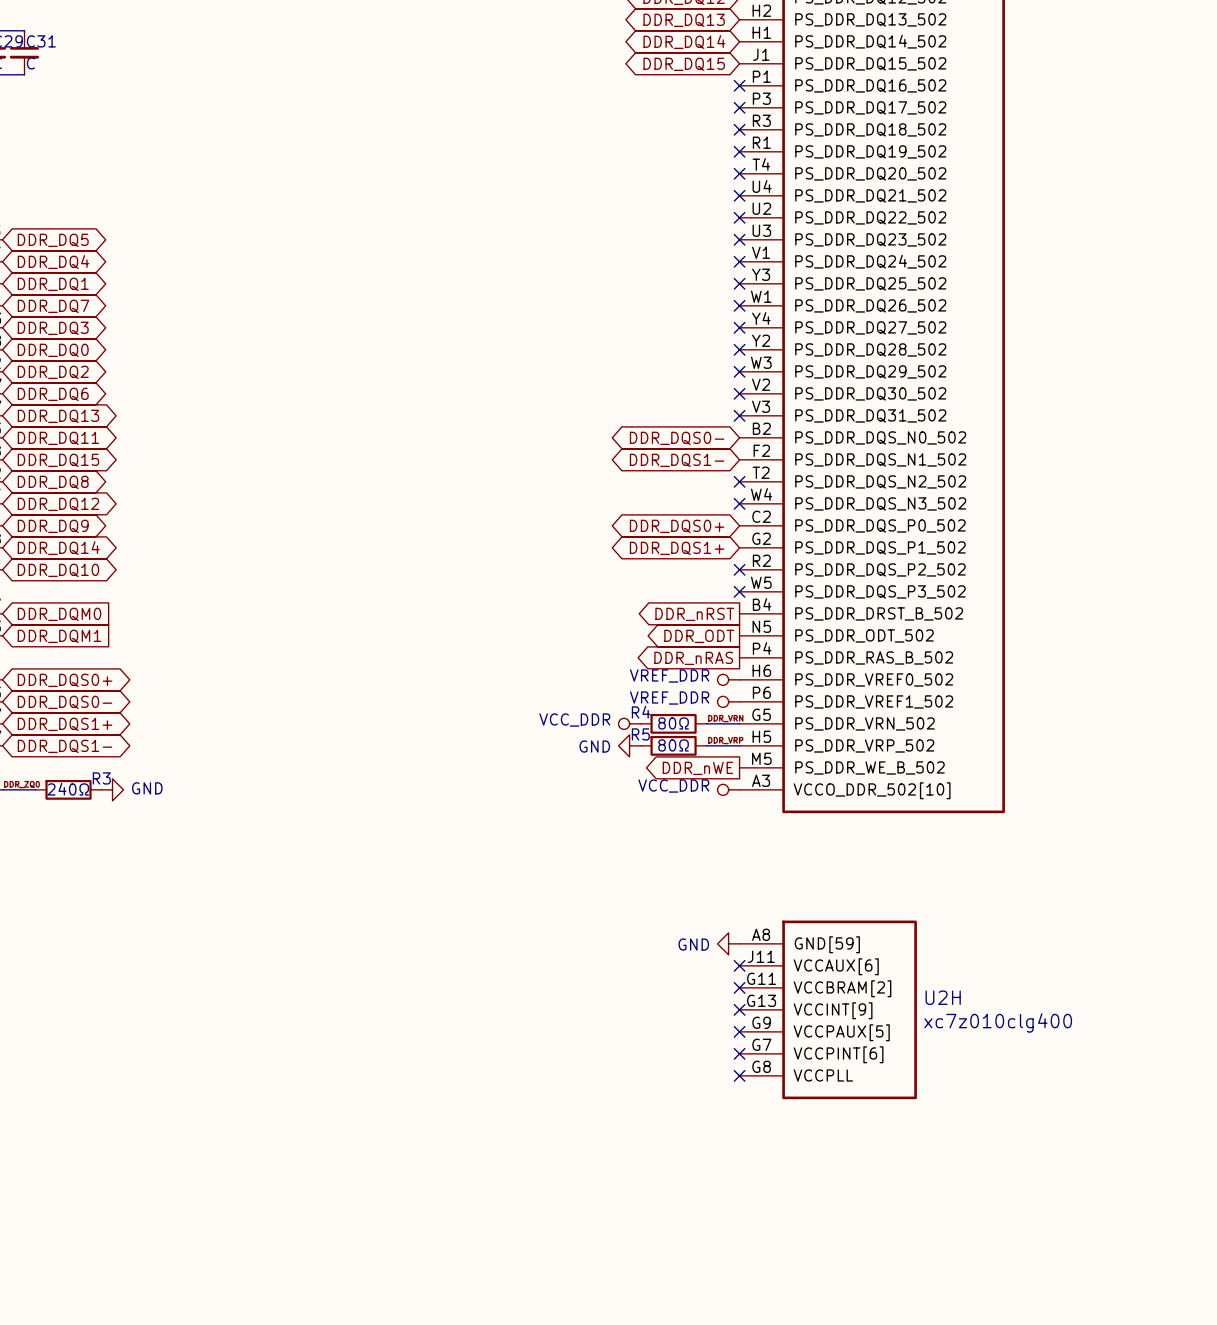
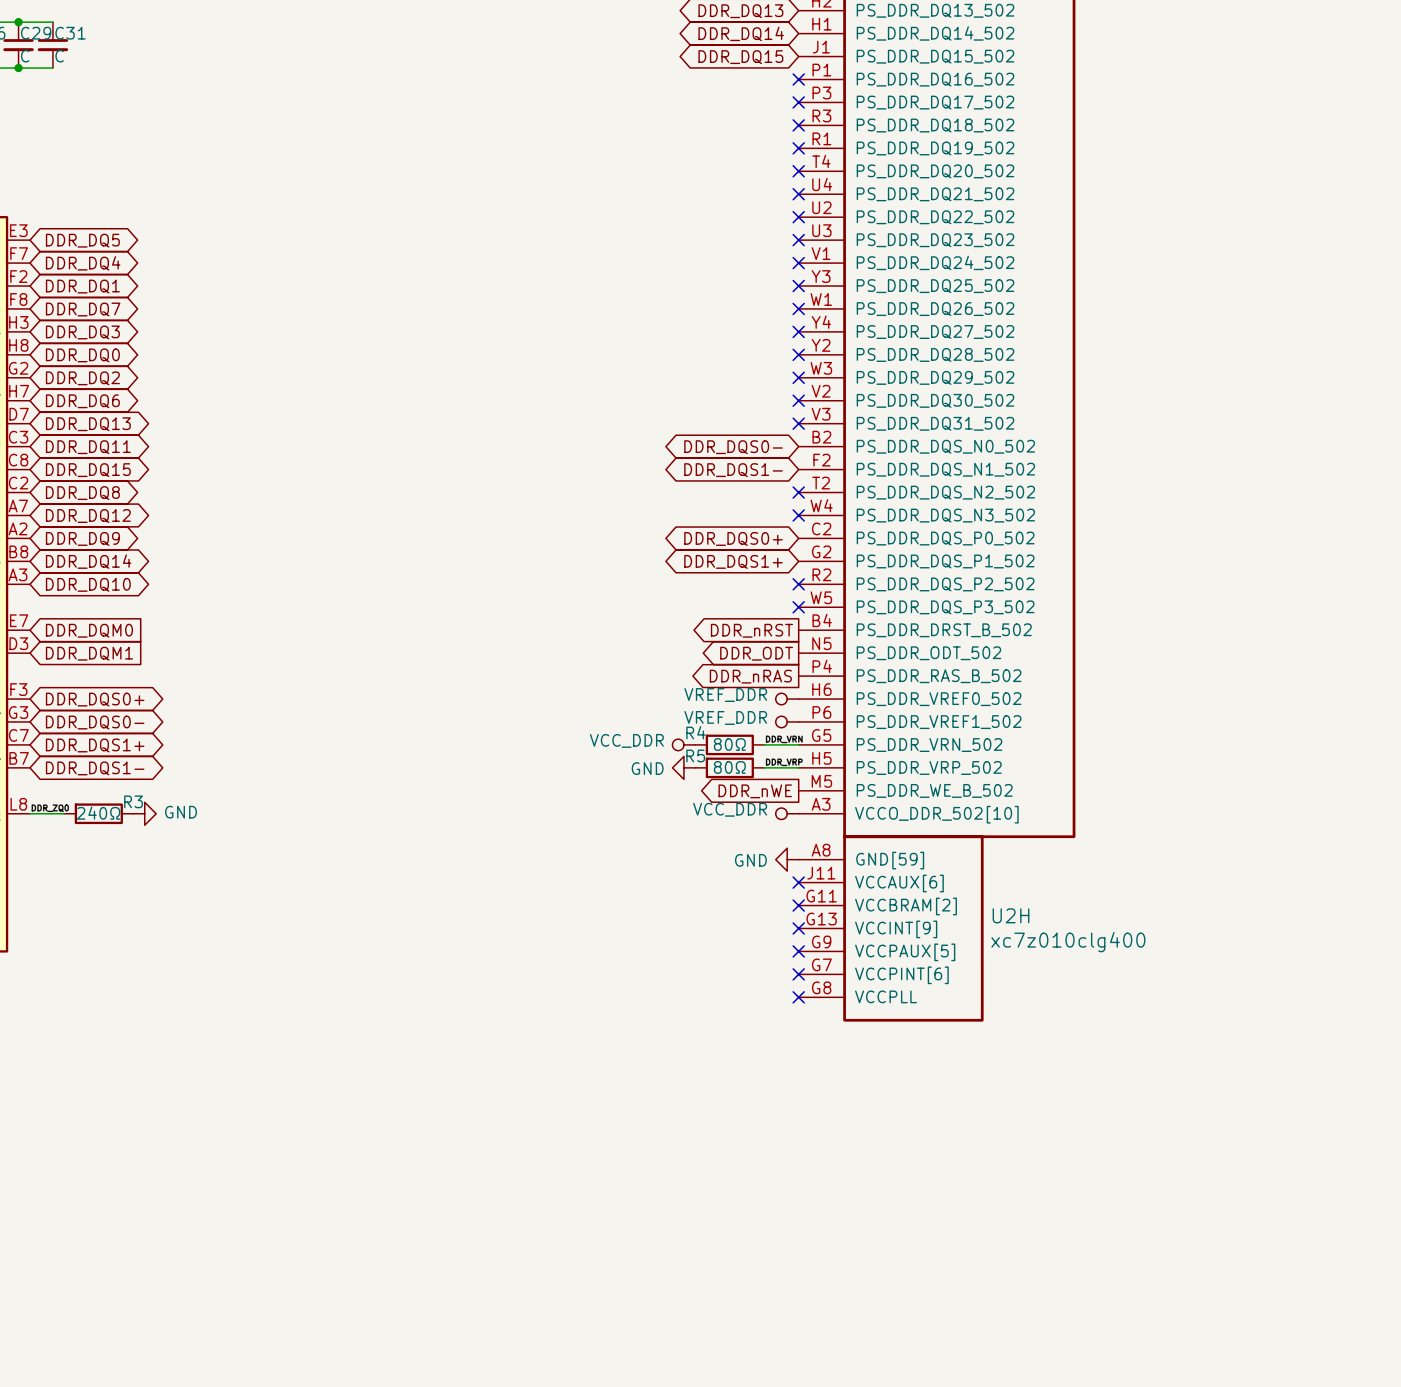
no-connect mark: none -> (798, 882)
no-connect mark: none -> (798, 905)
no-connect mark: none -> (798, 928)
no-connect mark: none -> (798, 951)
power symbol position: GND (728, 943) -> GND (787, 859)
no-connect mark: none -> (798, 974)
no-connect mark: (739, 987) -> none
no-connect mark: (739, 1009) -> none
U2H position: (828, 1009) -> (891, 928)
no-connect mark: (739, 1031) -> none
no-connect mark: (739, 1053) -> none
no-connect mark: (739, 1075) -> none

